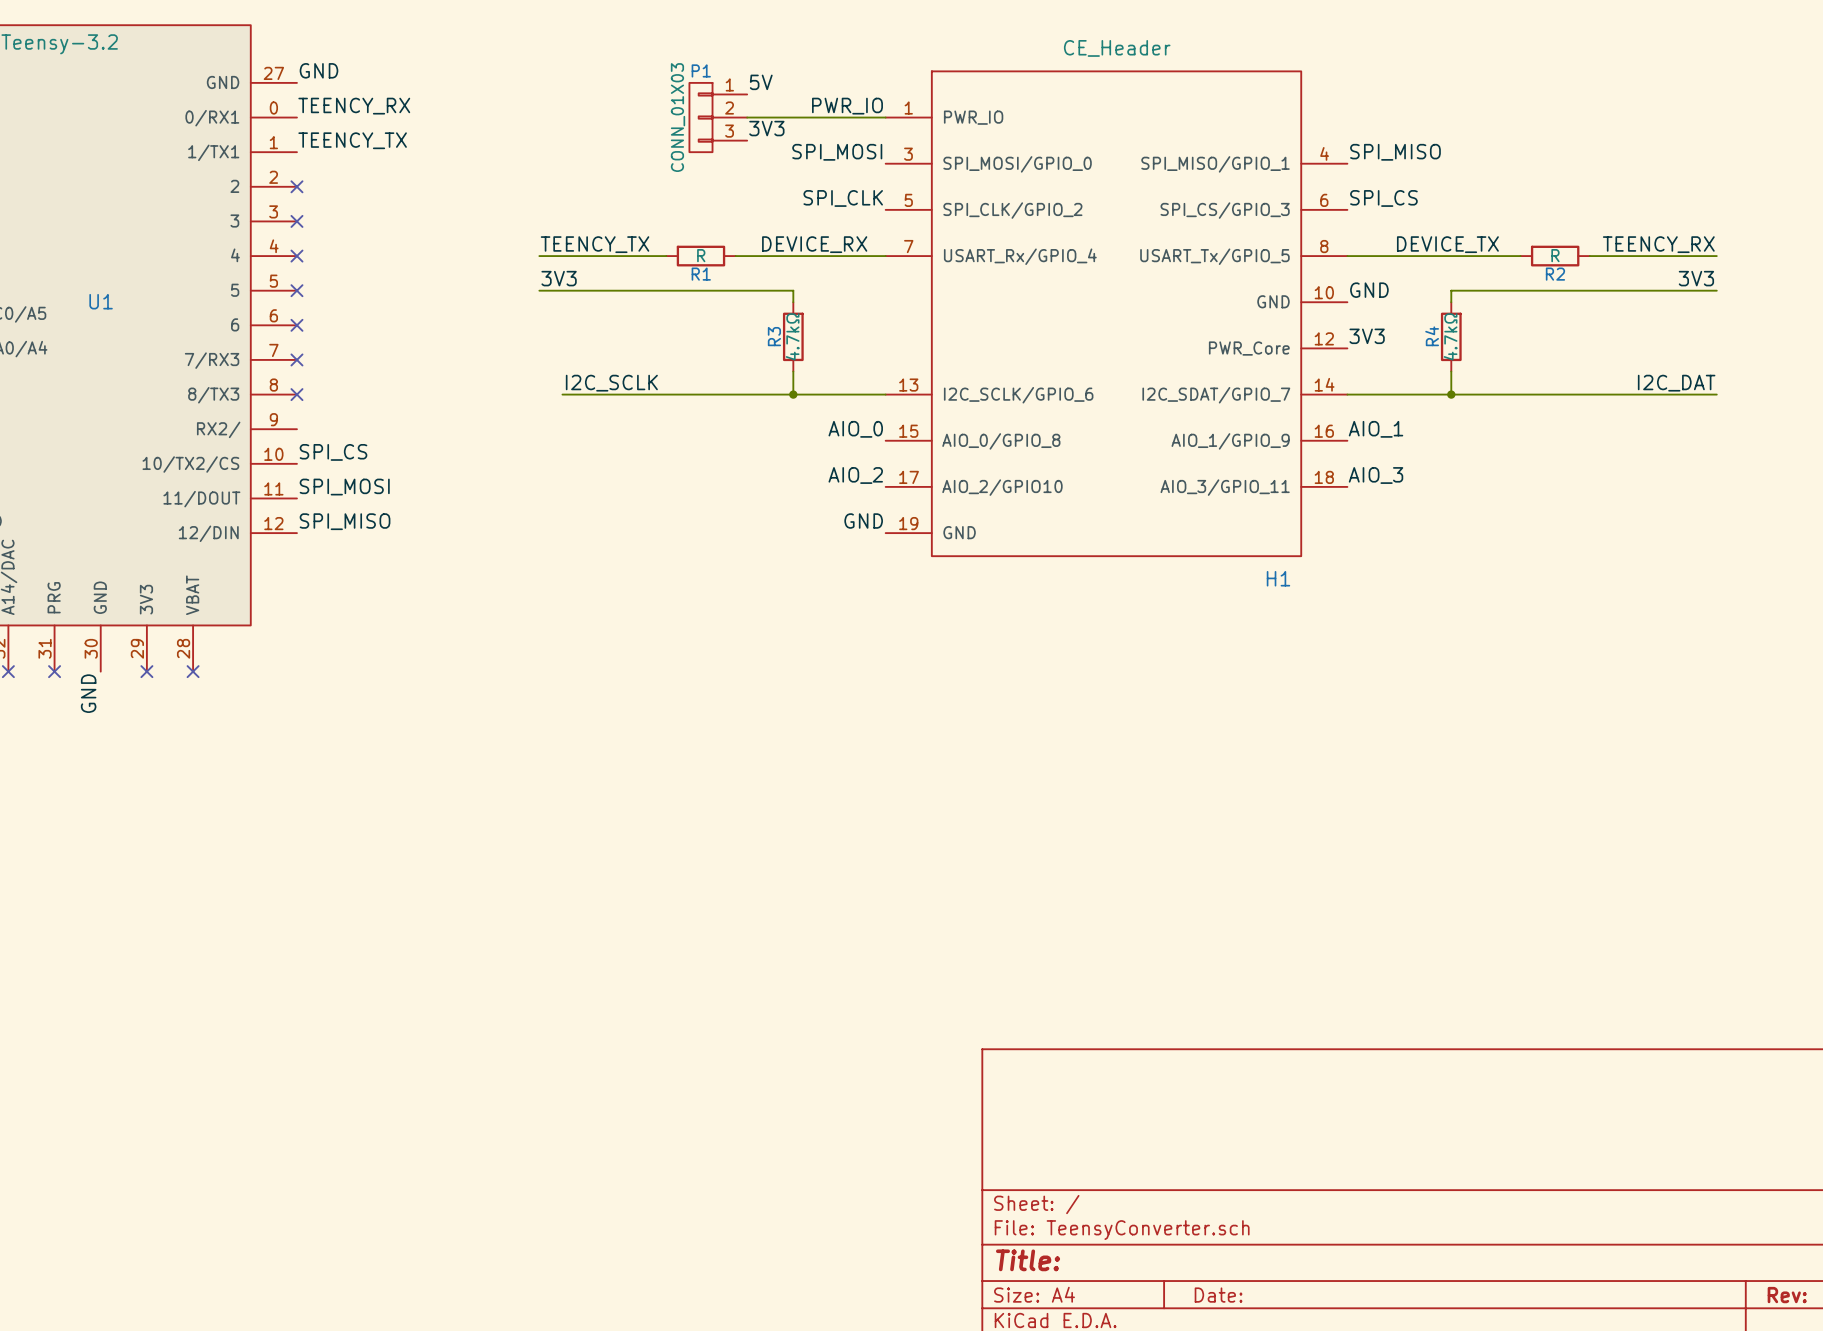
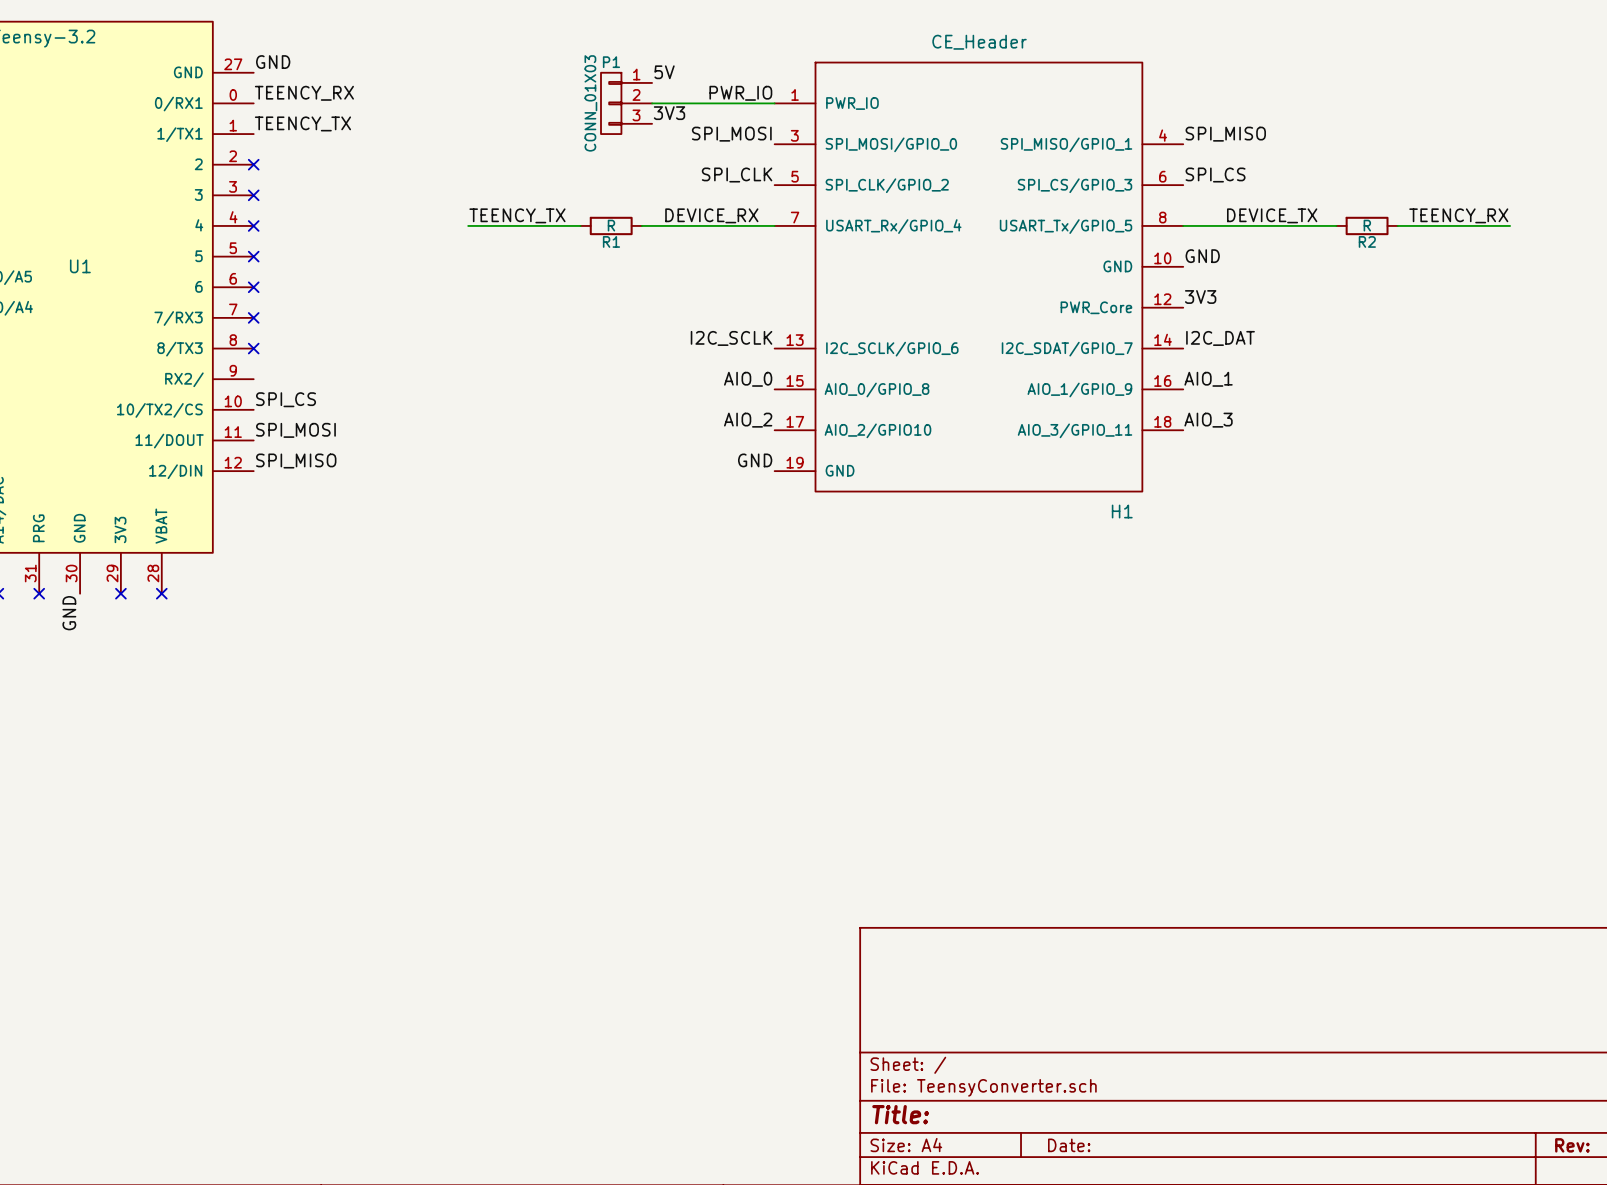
label: 3V3 (559, 278) -> none
label: 3V3 (1696, 278) -> none
wire: (539, 290) (793, 290) (793, 302) -> none
wire: (1716, 290) (1451, 290) (1451, 302) -> none
R3: 4.7kΩ (793, 336) -> none
R4: 4.7kΩ (1451, 336) -> none
wire: (793, 371) (793, 394) -> none
wire: (1451, 371) (1451, 394) -> none
label: I2C_SCLK (611, 383) -> none
label: none -> I2C_SCLK (731, 338)
label: none -> I2C_DAT (1220, 338)
label: I2C_DAT (1676, 383) -> none
wire: (562, 394) (885, 394) -> none
junction: (793, 394) -> none
wire: (1347, 394) (1716, 394) -> none
junction: (1451, 394) -> none

